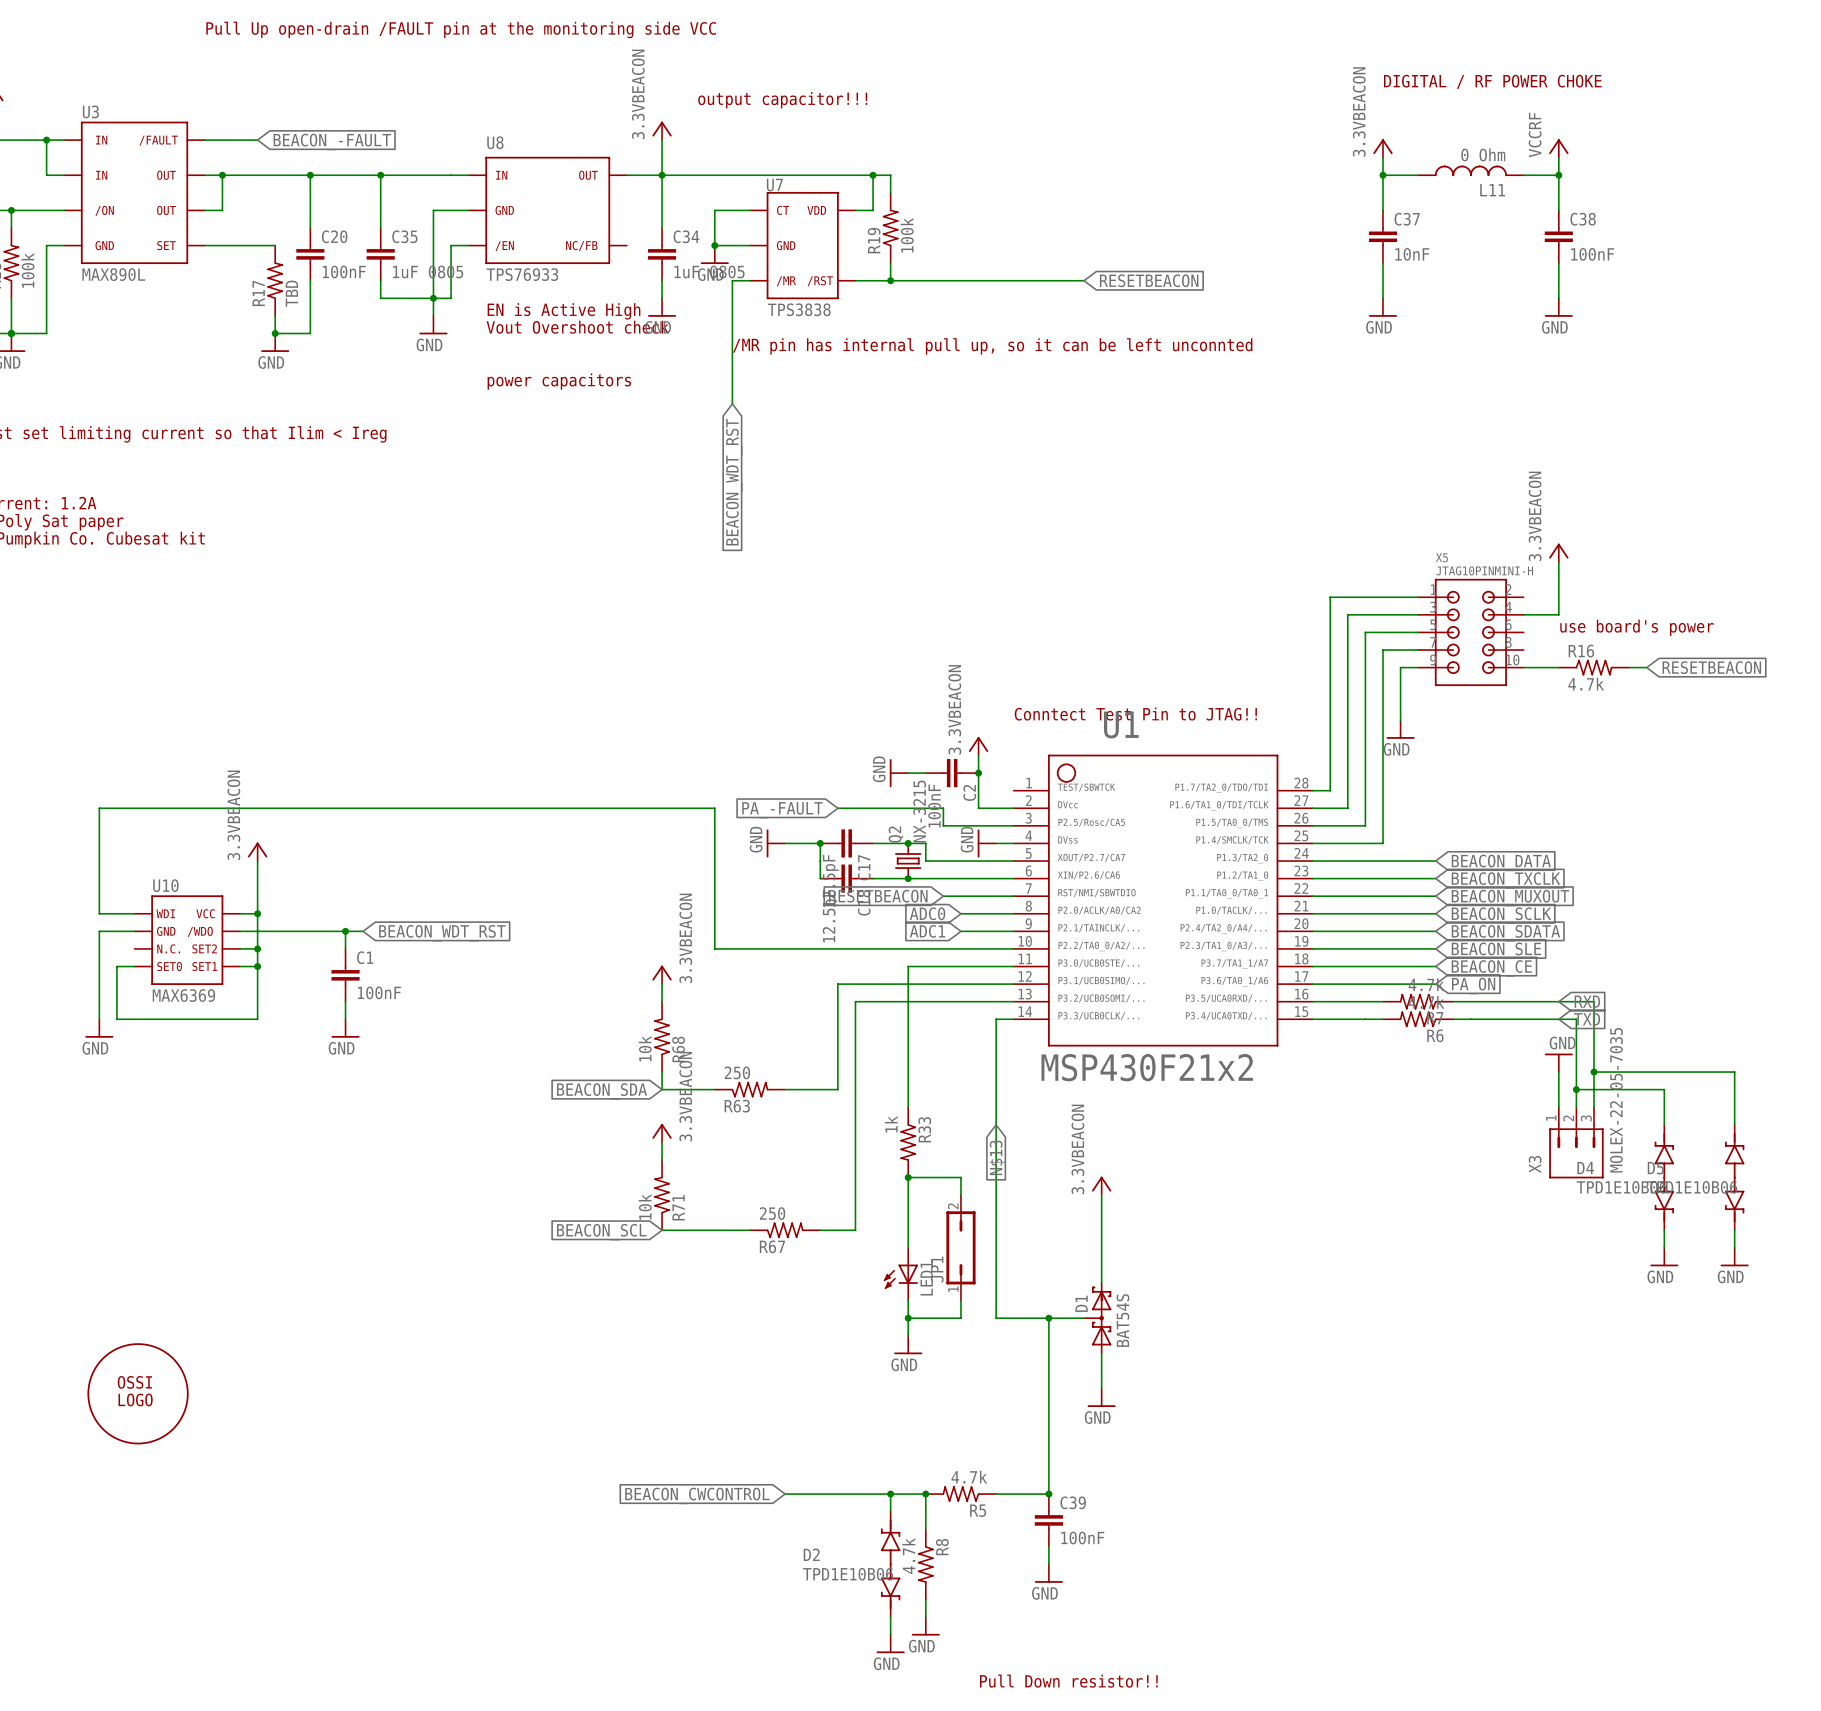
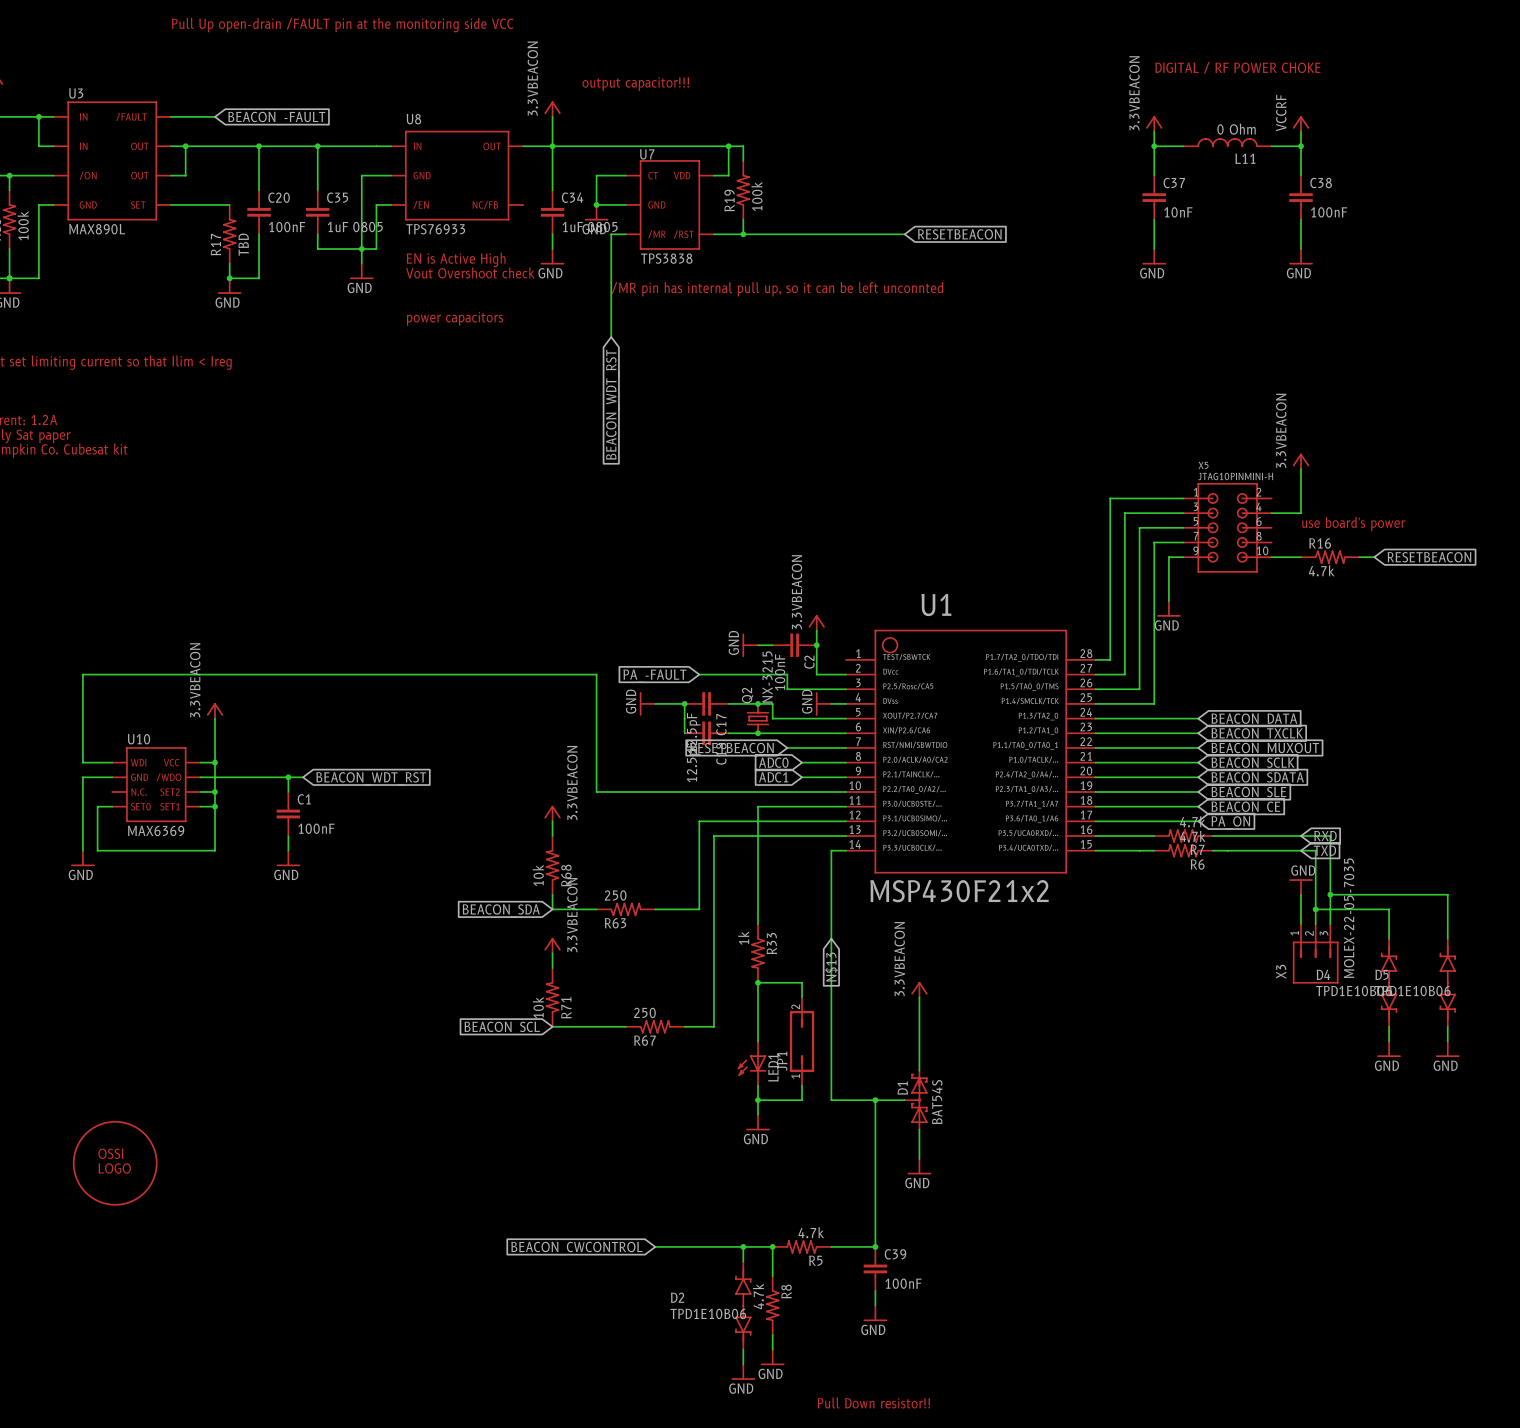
text: Conntect Test Pin to JTAG!! (1135, 714) -> none

